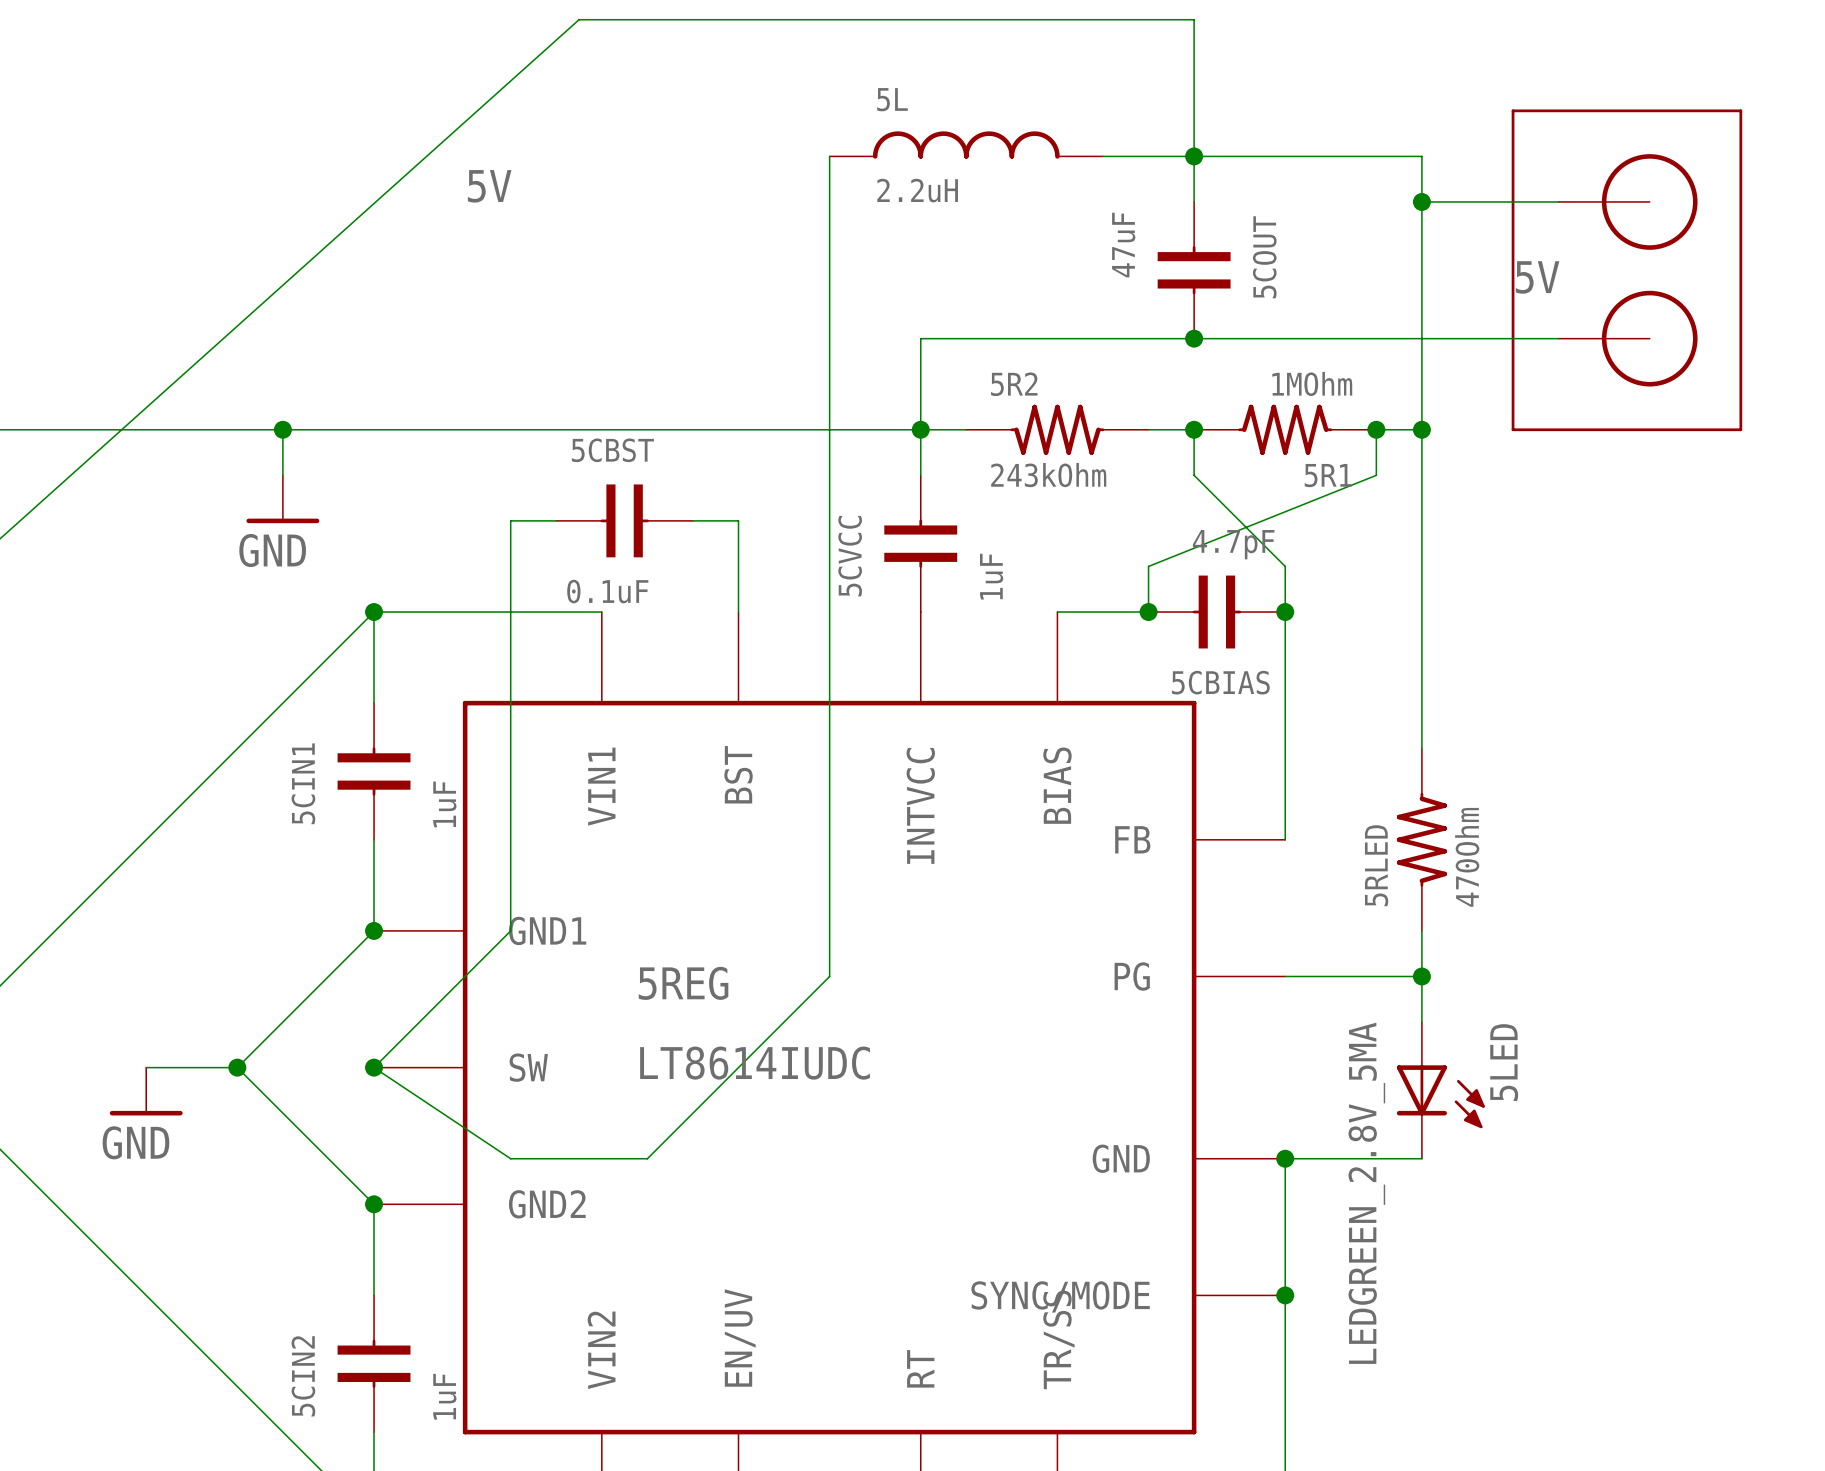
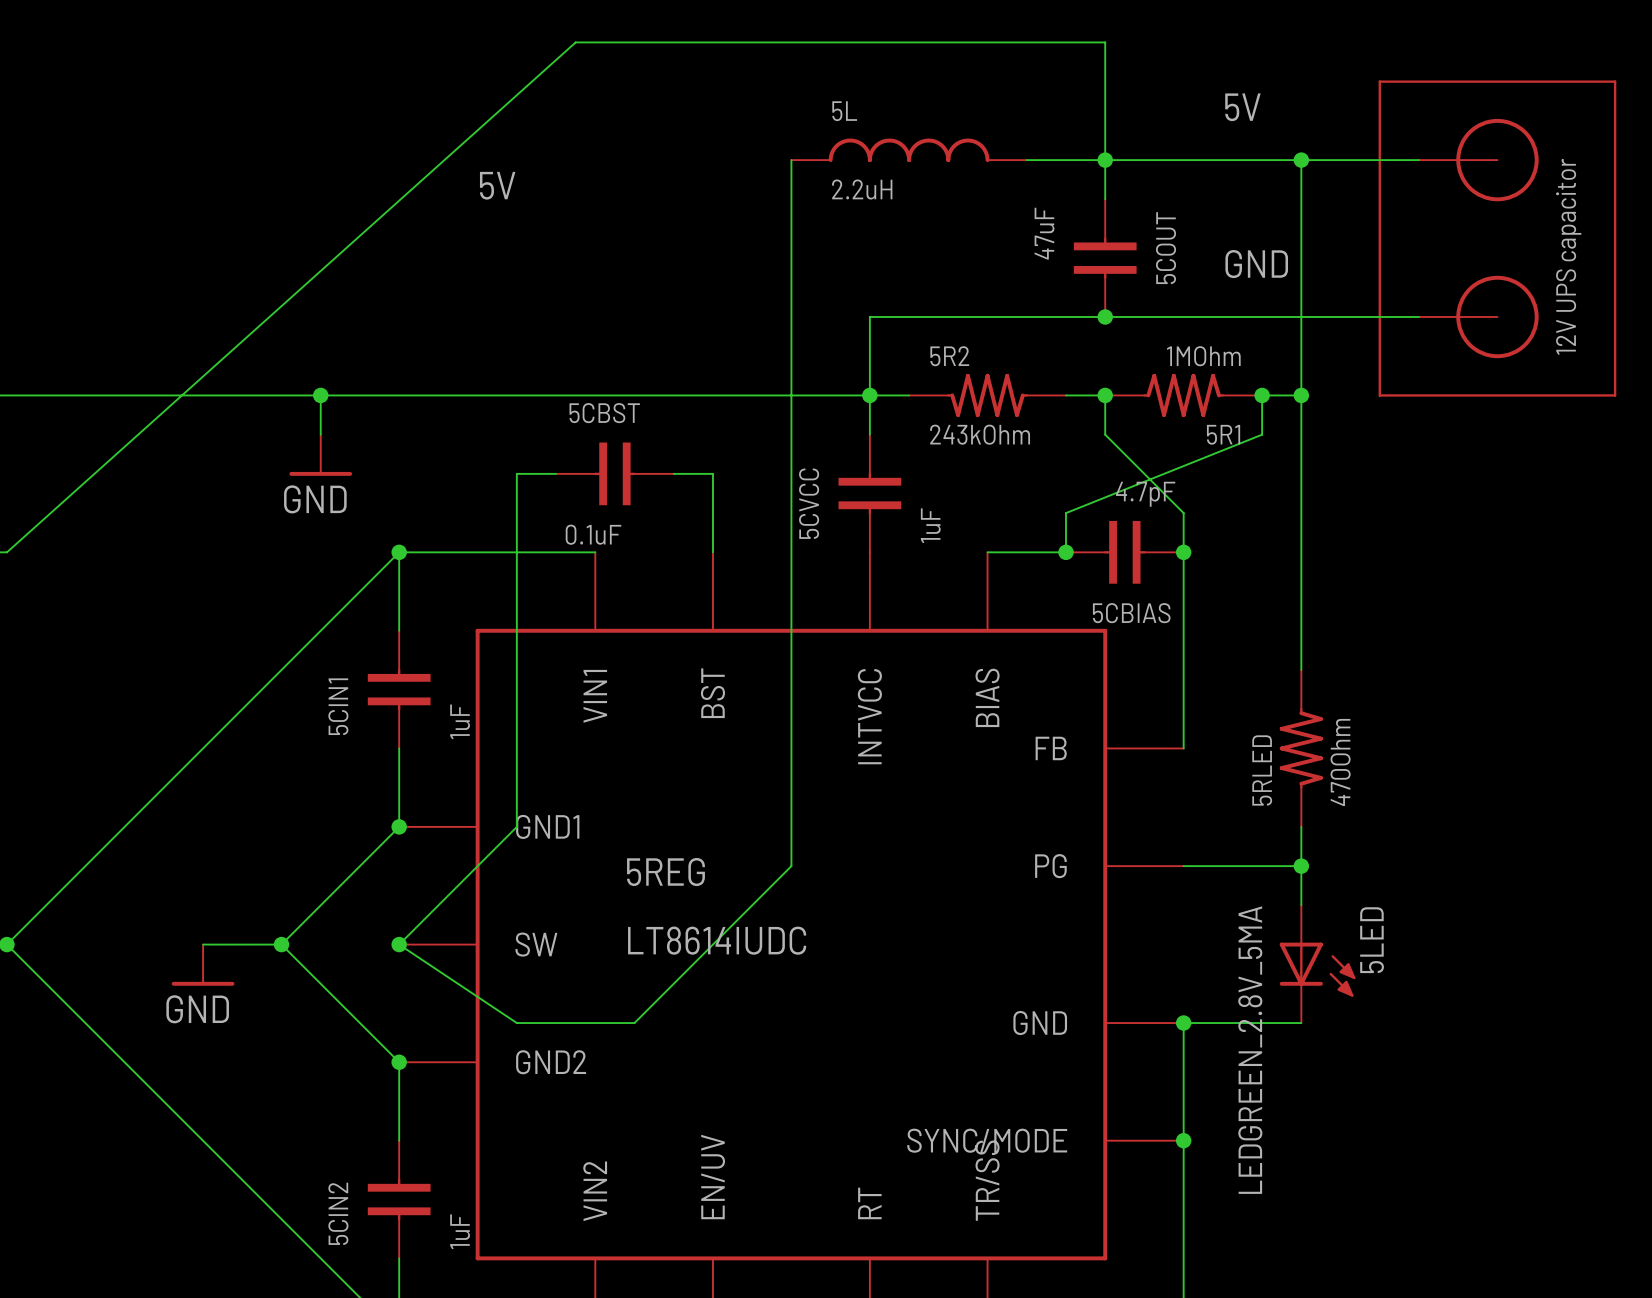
line: (1513, 110) (1740, 110) (1740, 429) -> (1379, 120) (1379, 81) (1615, 81) (1615, 395) (1575, 395)
wire: (1421, 201) (1558, 201) -> (1301, 160) (1419, 160)
junction position: (1421, 201) -> (1301, 160)
part position: (1628, 201) -> (1478, 160)
text: none -> 12V UPS capacitor (1568, 256)
label: none -> GND (1256, 264)
label position: 5V (1537, 277) -> 5V (1242, 107)

